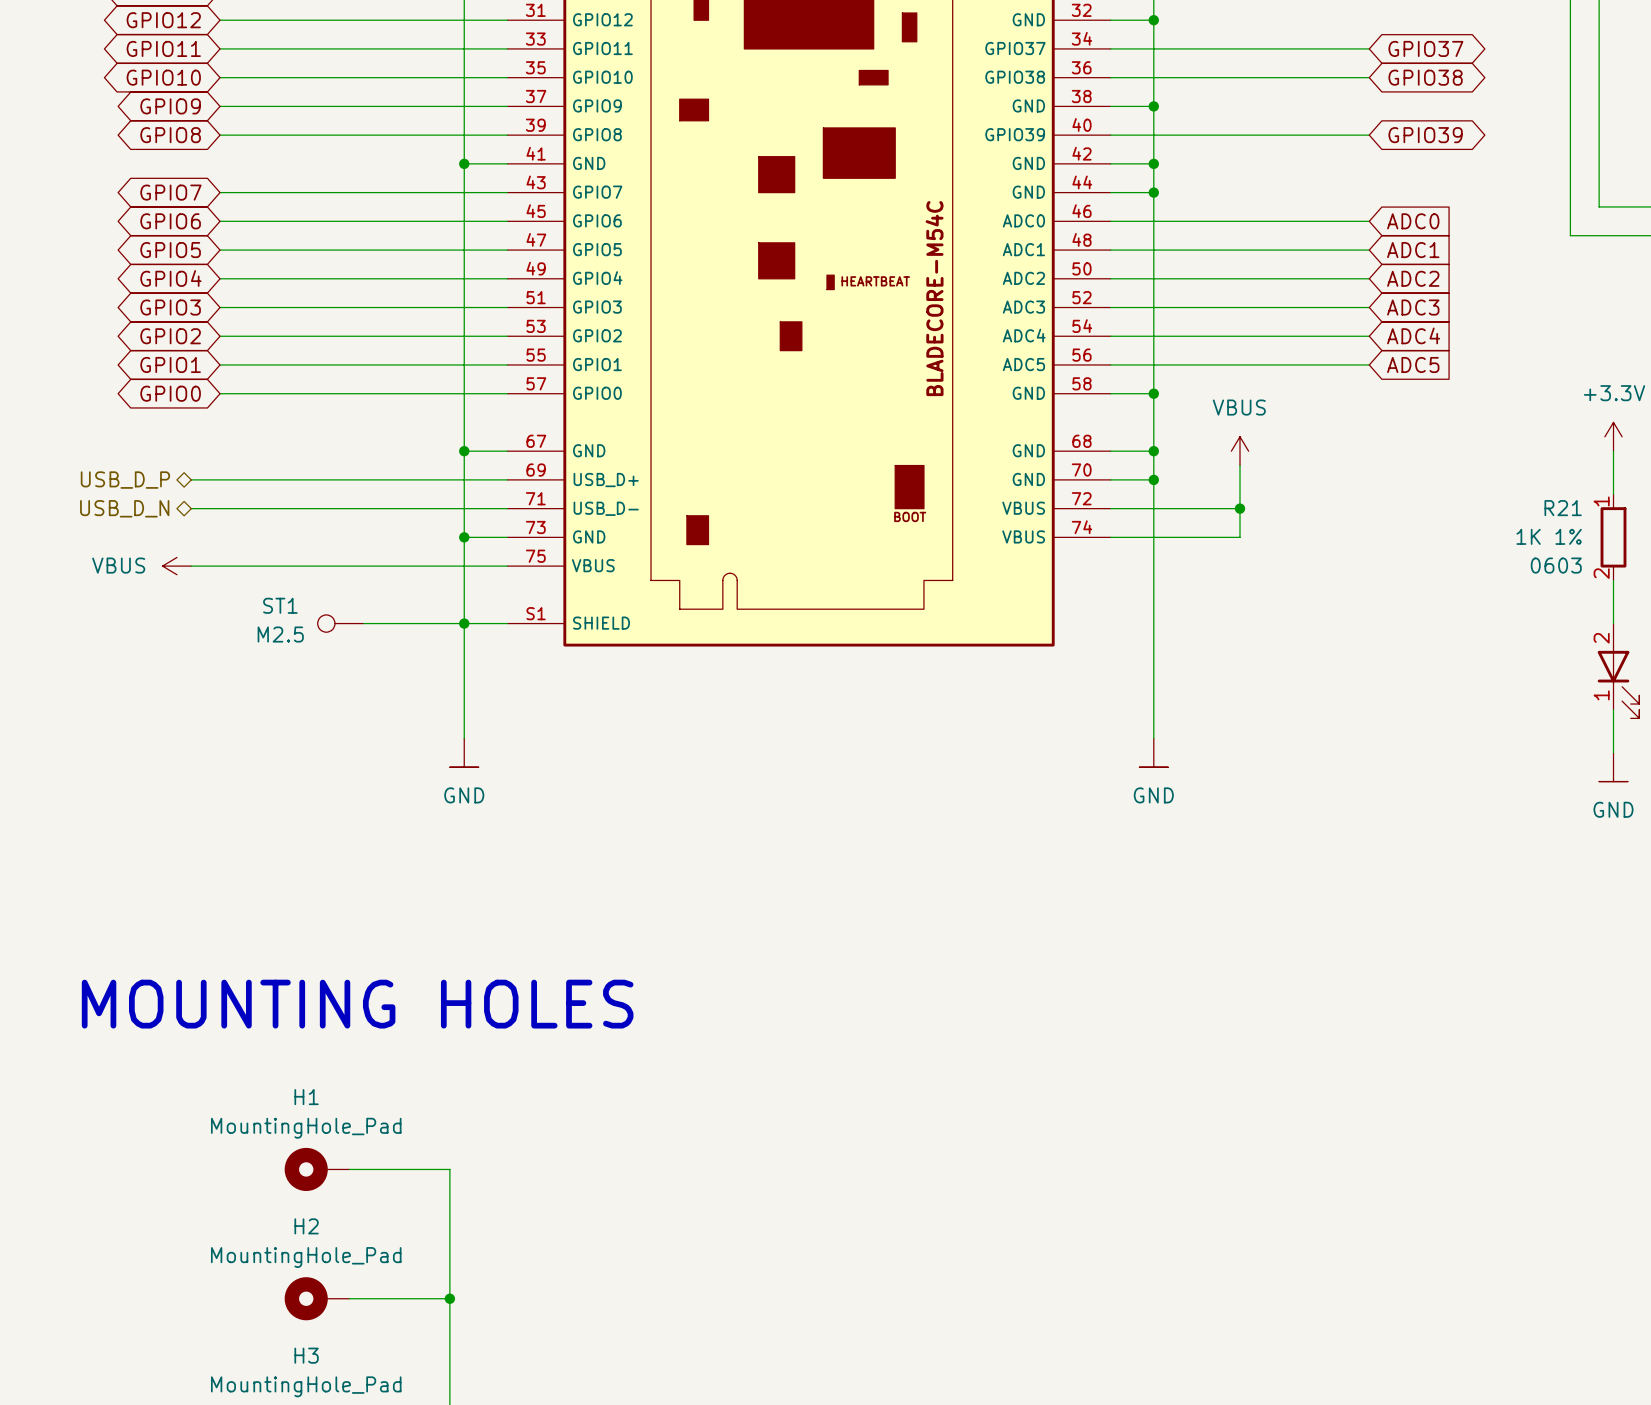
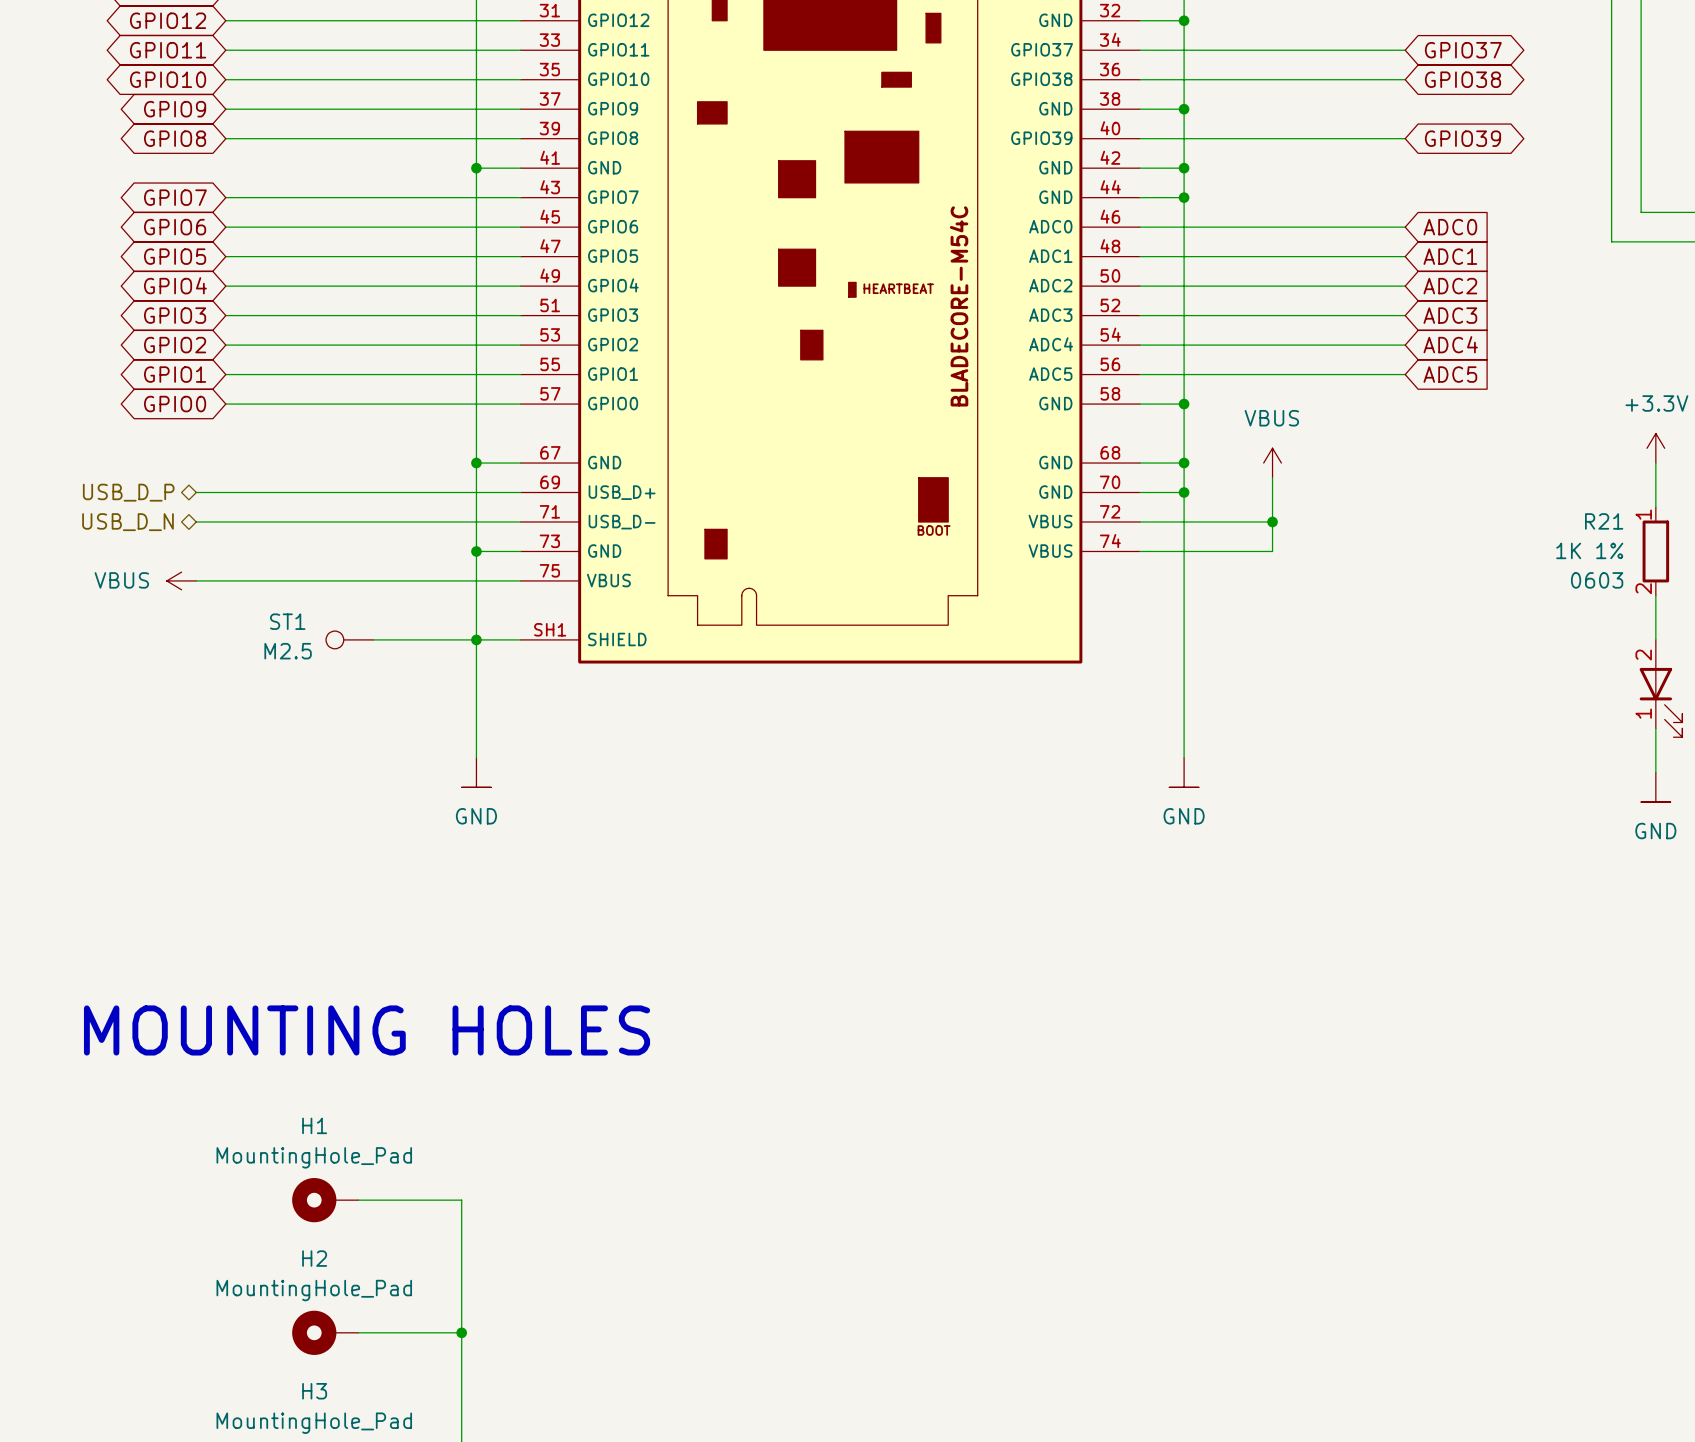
part pin number: S1 (536, 613) -> SH1 (550, 629)

